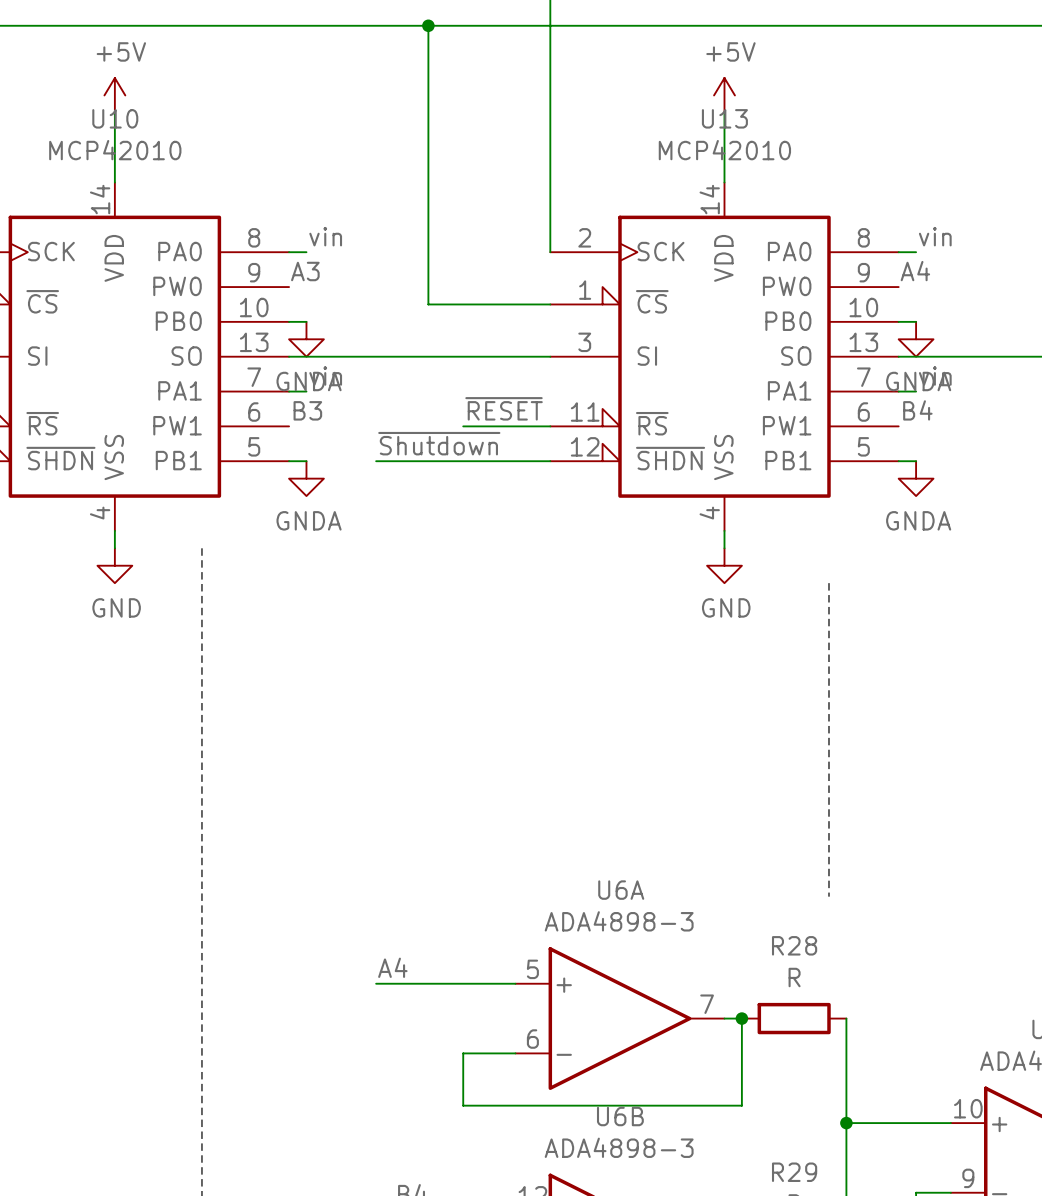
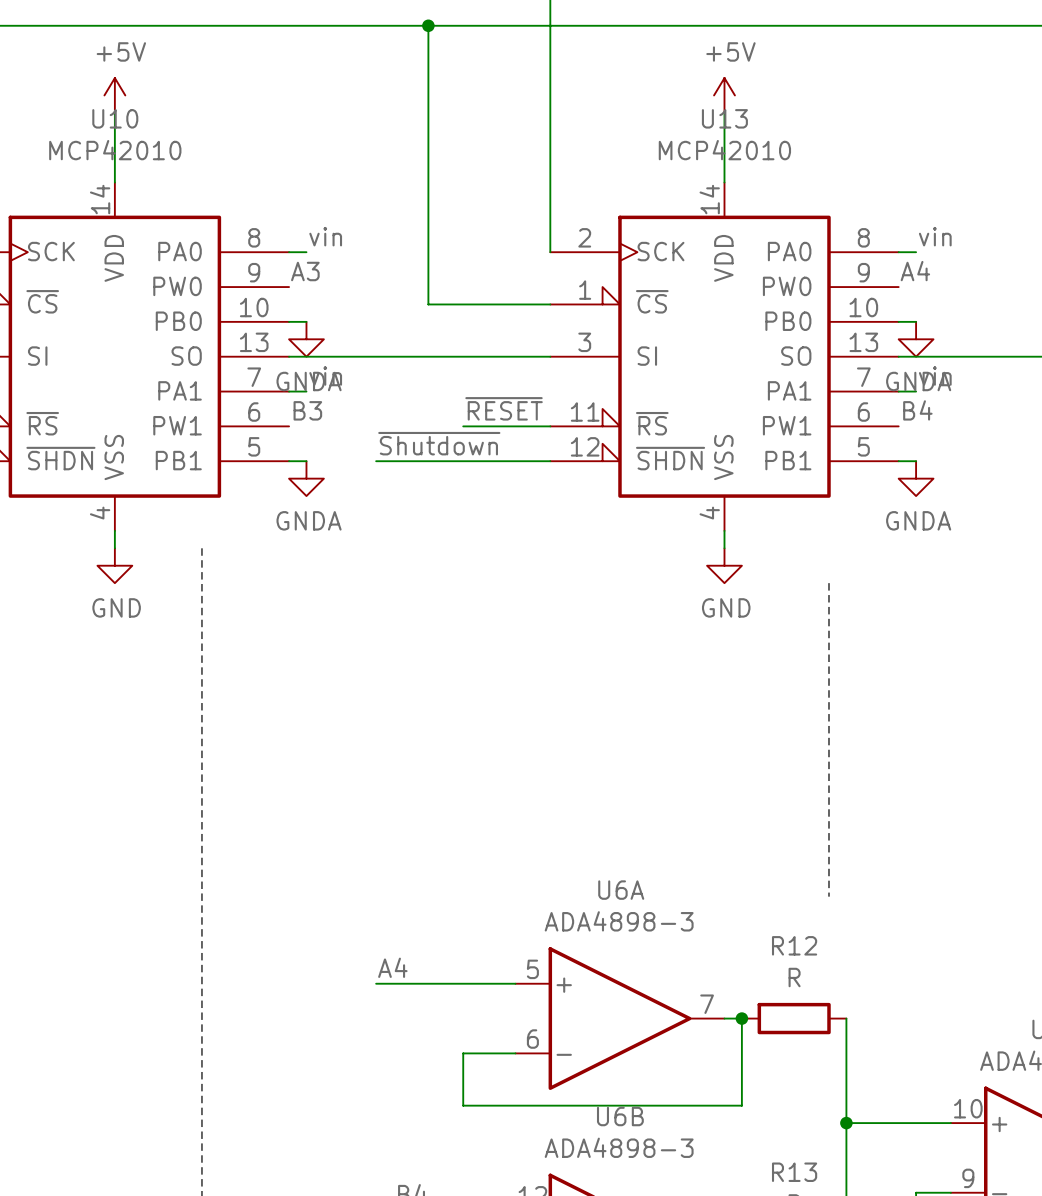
R28 name: R28 (794, 945) -> R12 (794, 945)
R29 name: R29 (794, 1172) -> R13 (794, 1172)

